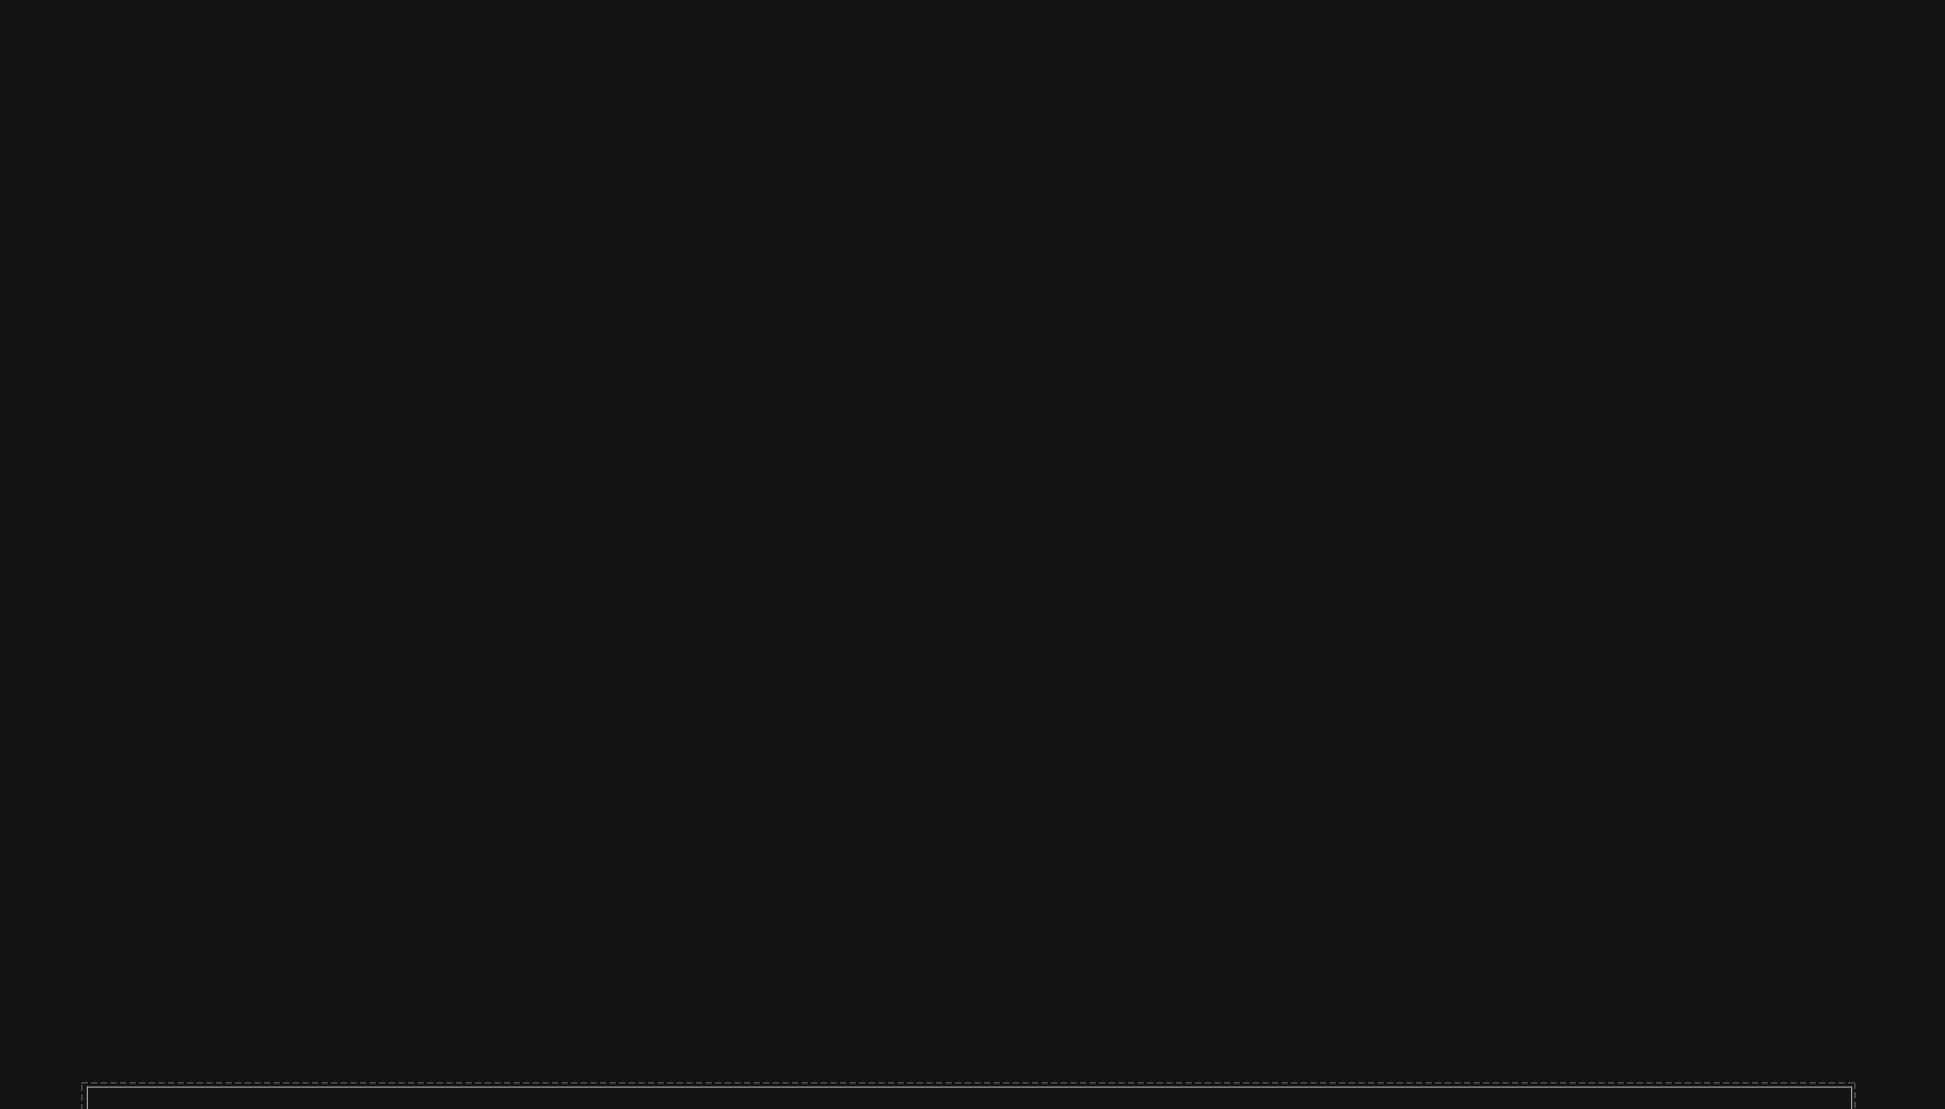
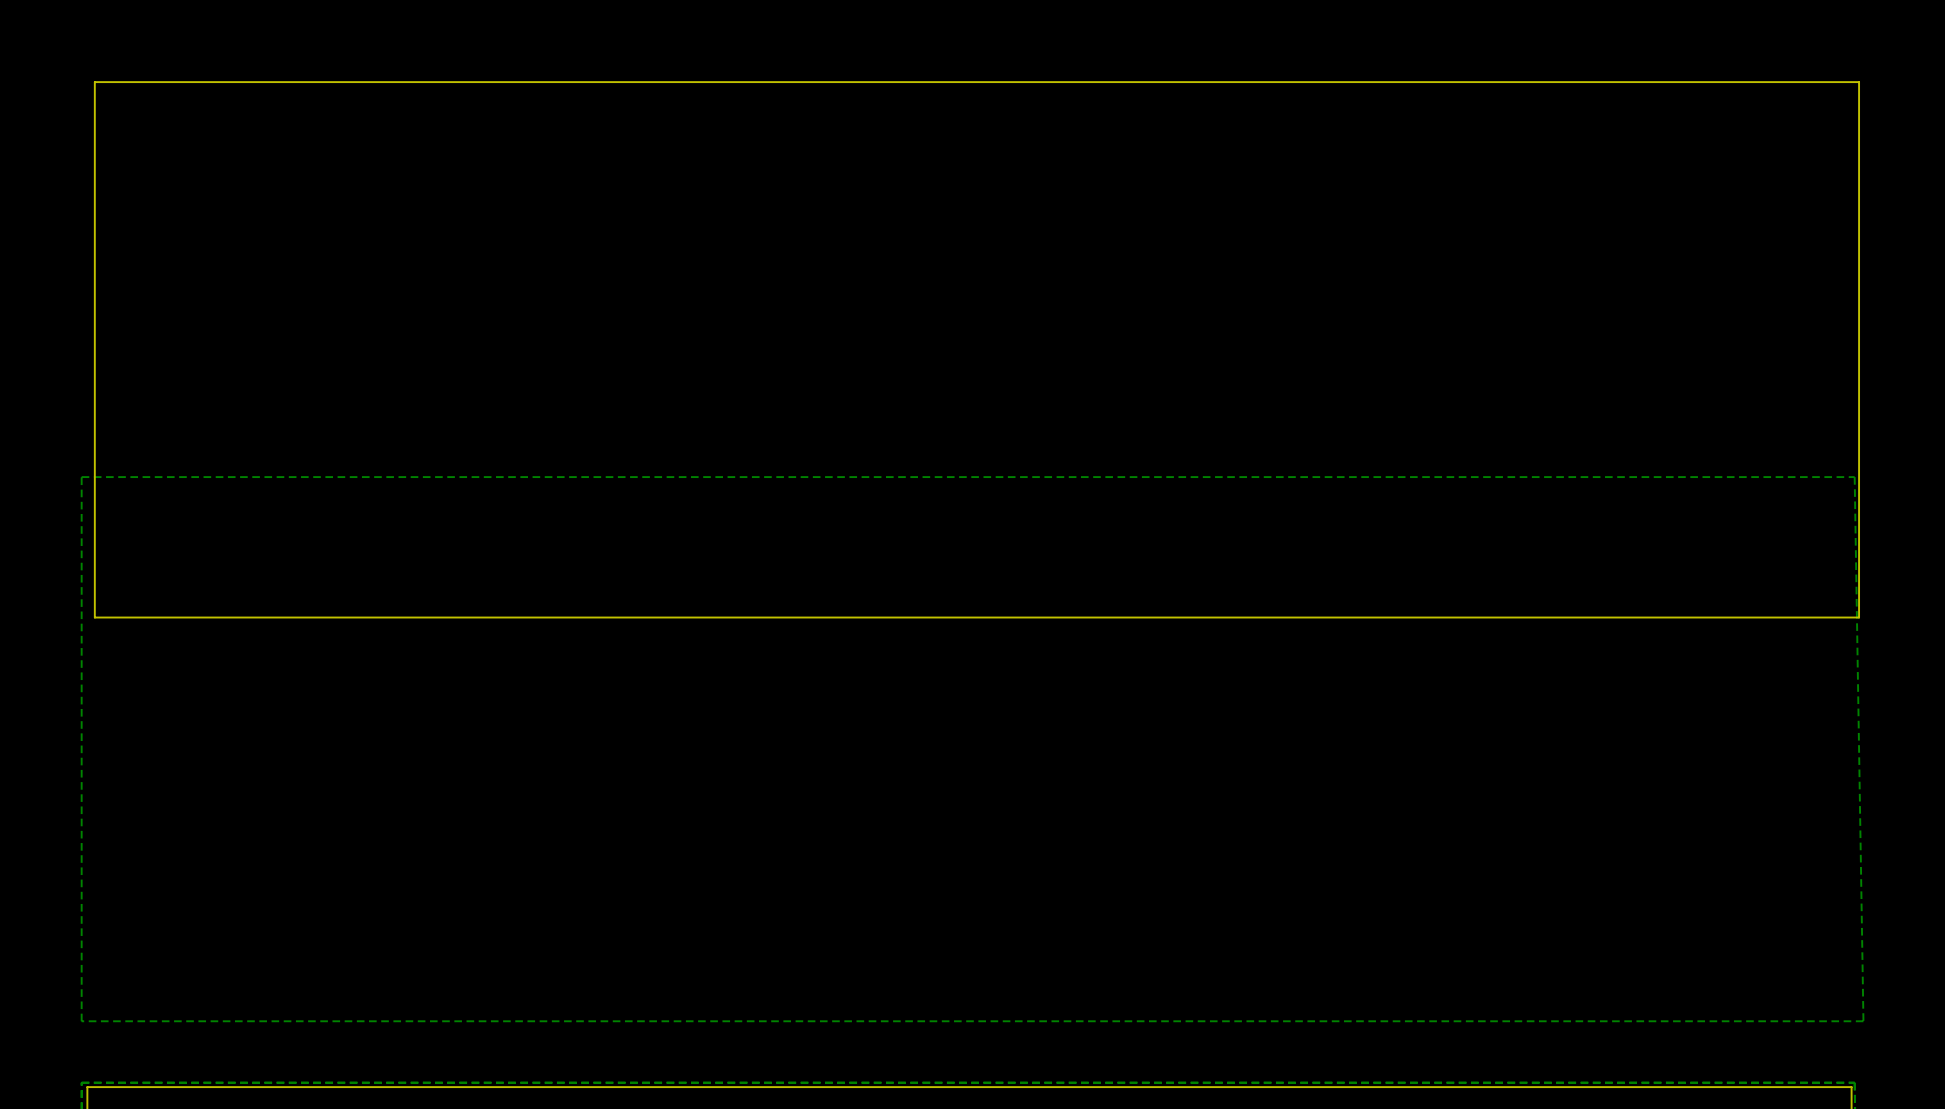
board edge: none -> (1859, 82) (94, 82) (94, 617) (1859, 617) (1859, 82)
zone outline: none -> (1854, 477) (81, 477) (81, 1021) (1863, 1021) (1854, 477)

